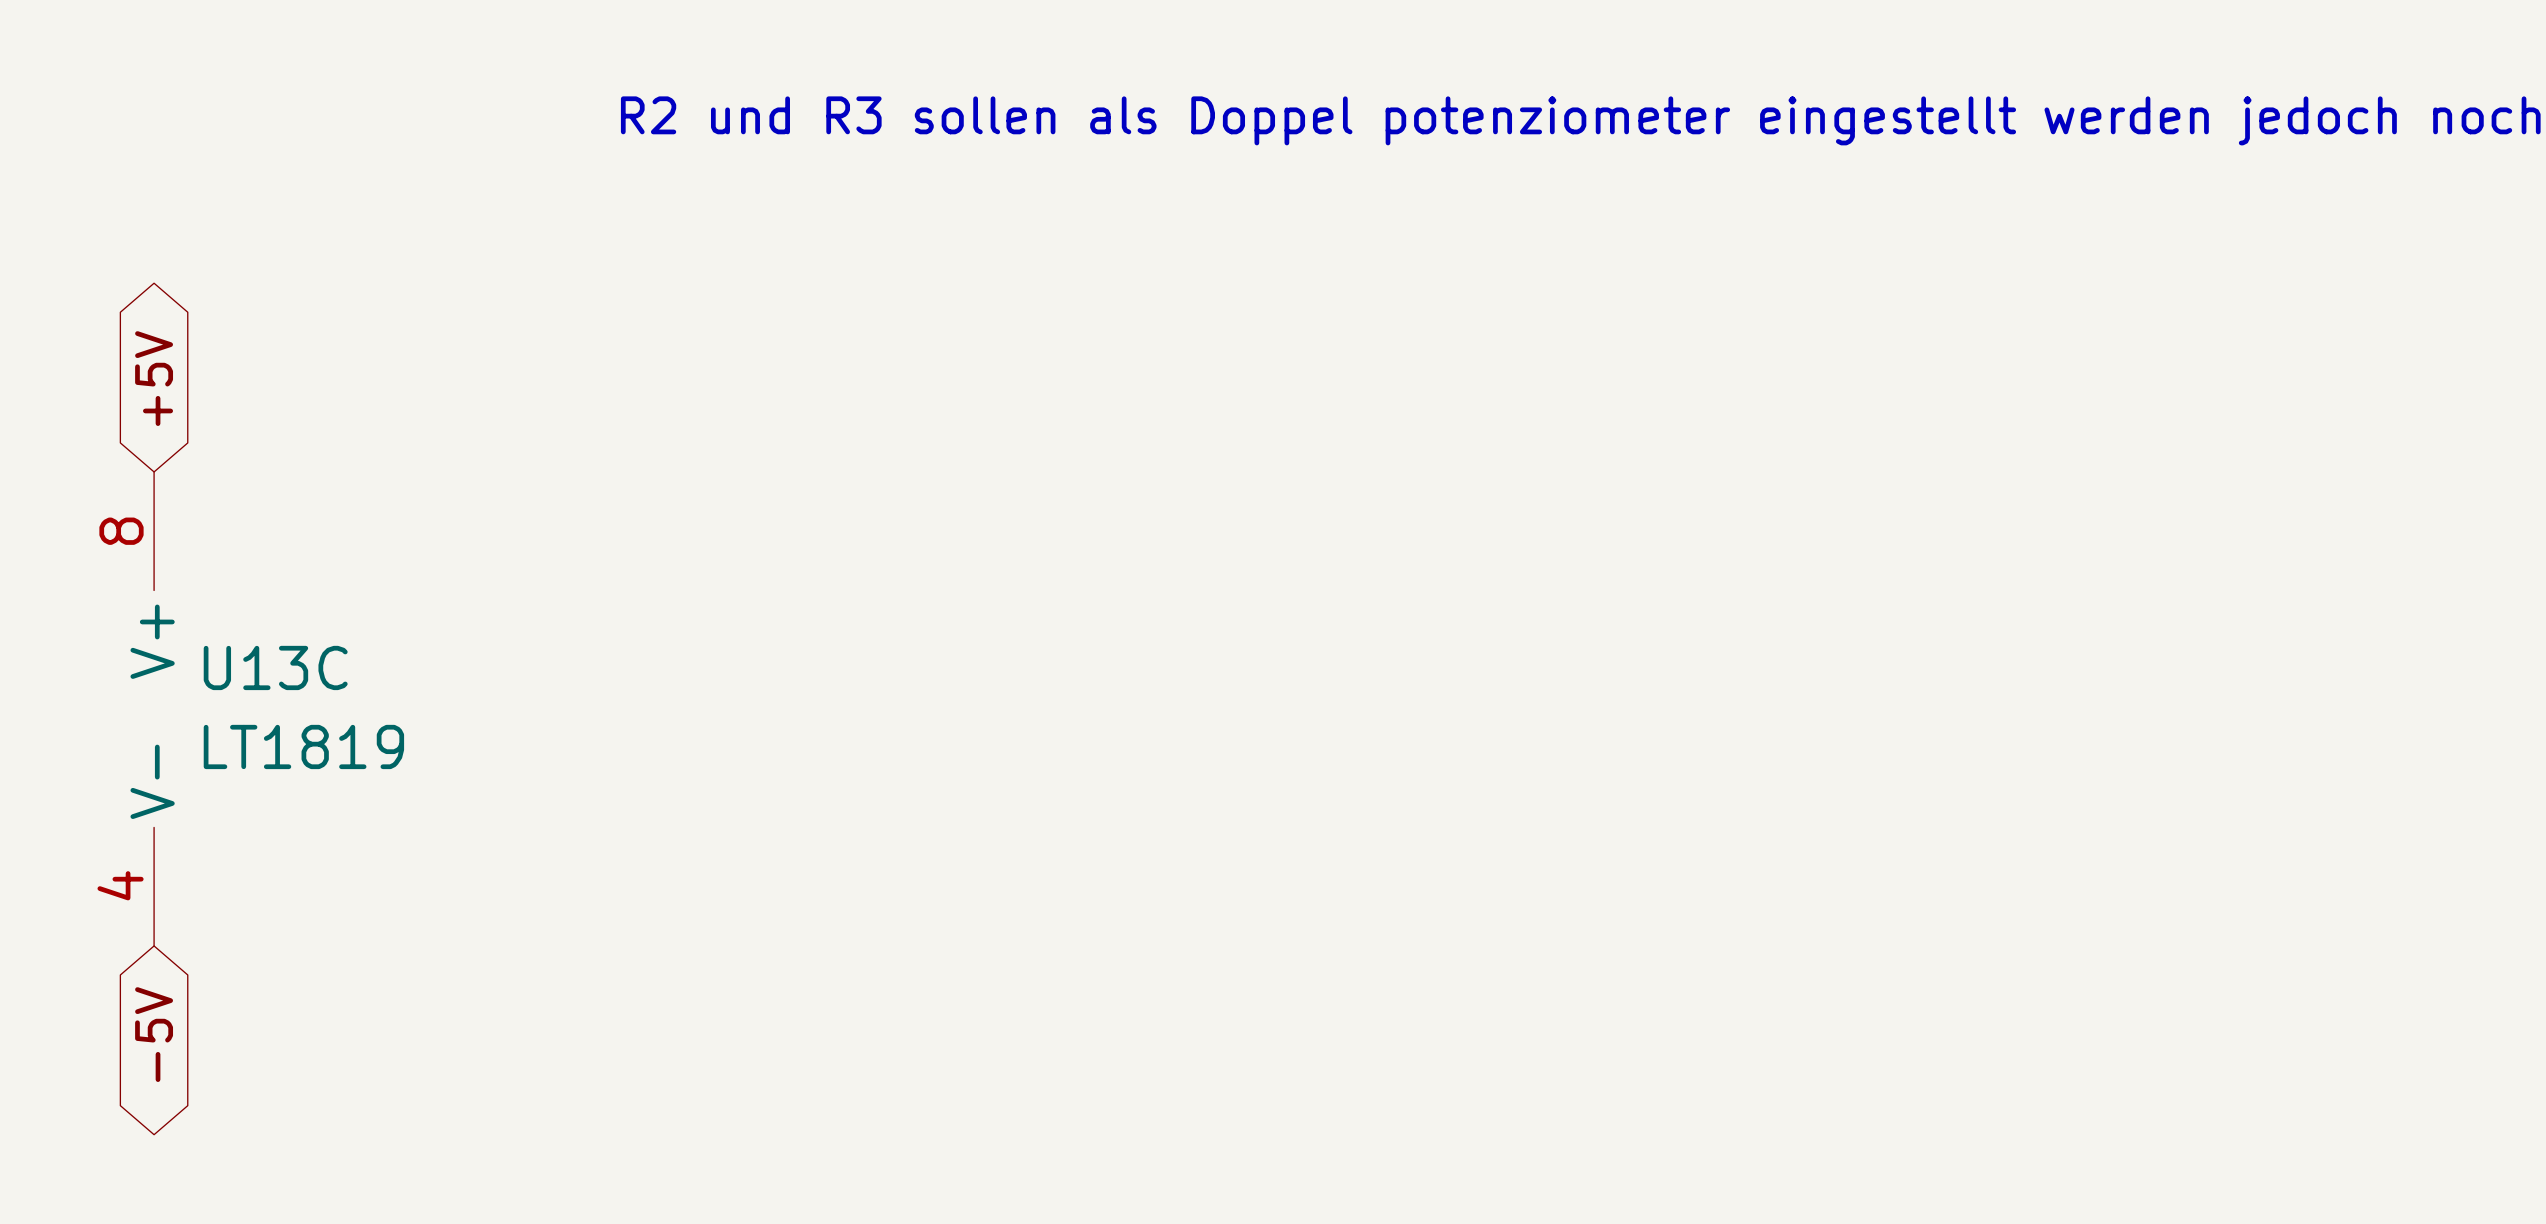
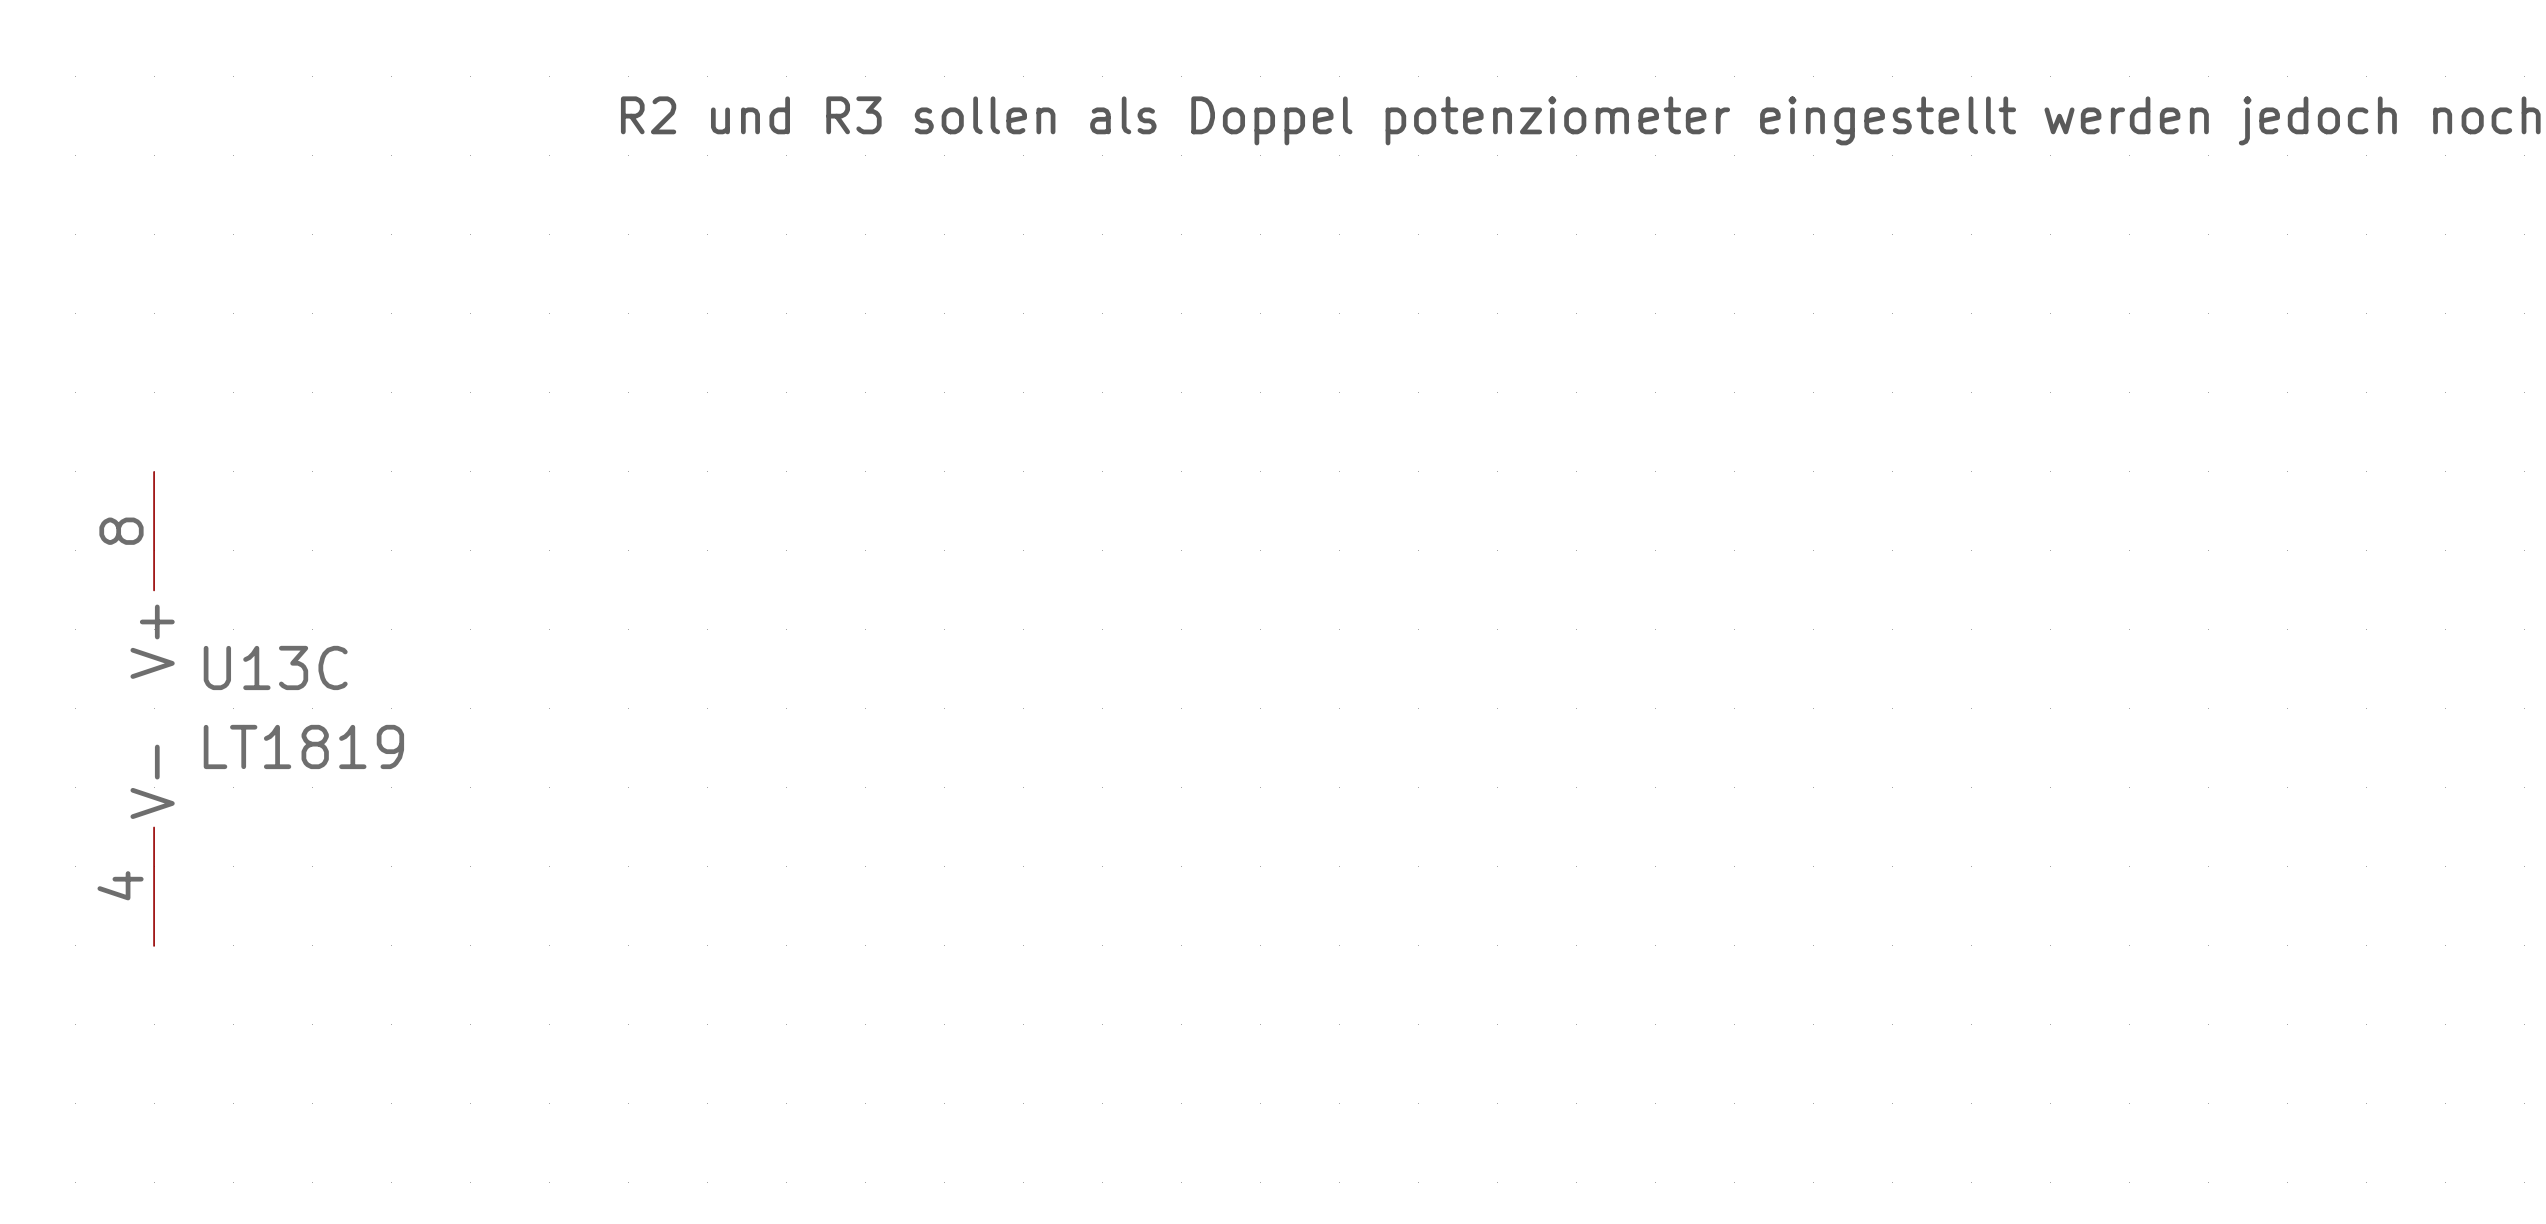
global label: +5V (154, 378) -> none
global label: -5V (154, 1034) -> none

